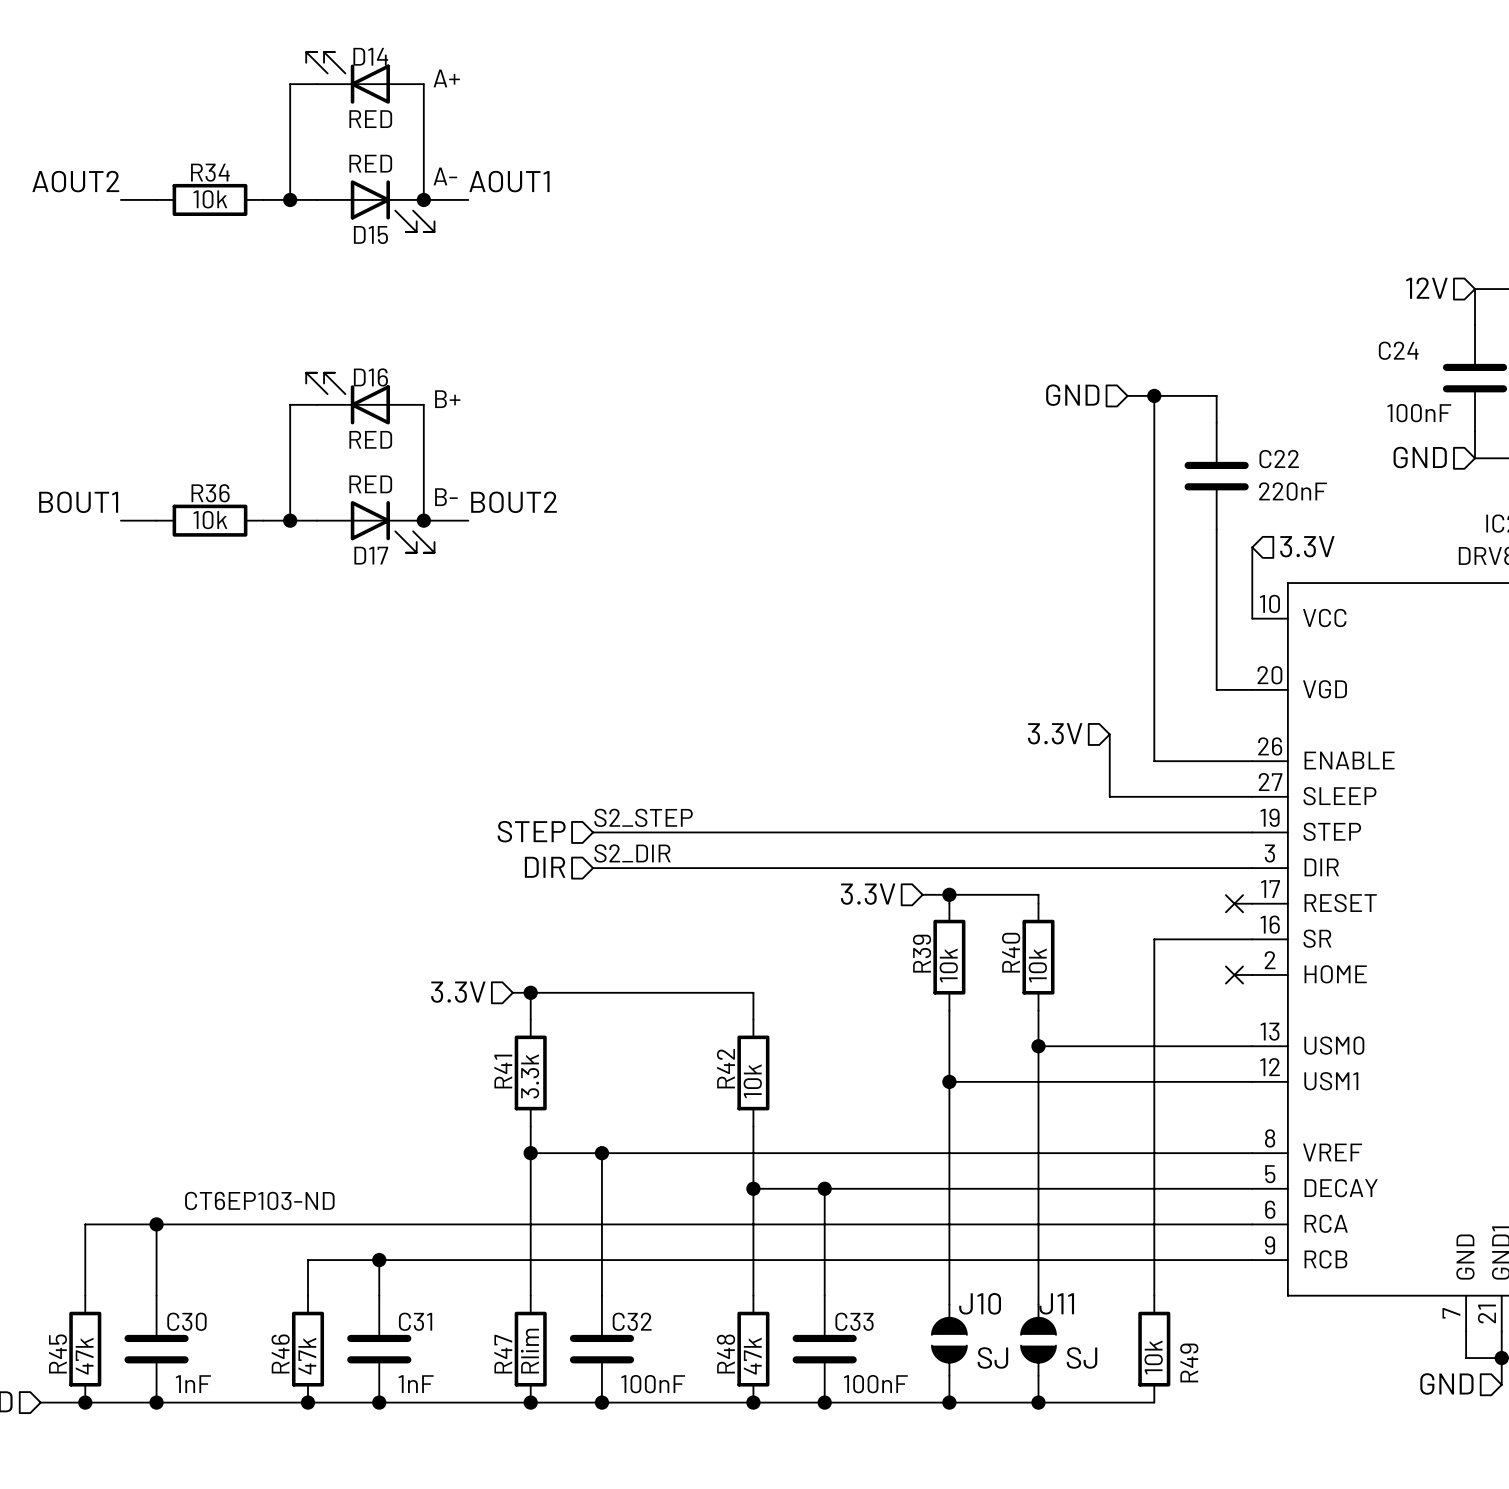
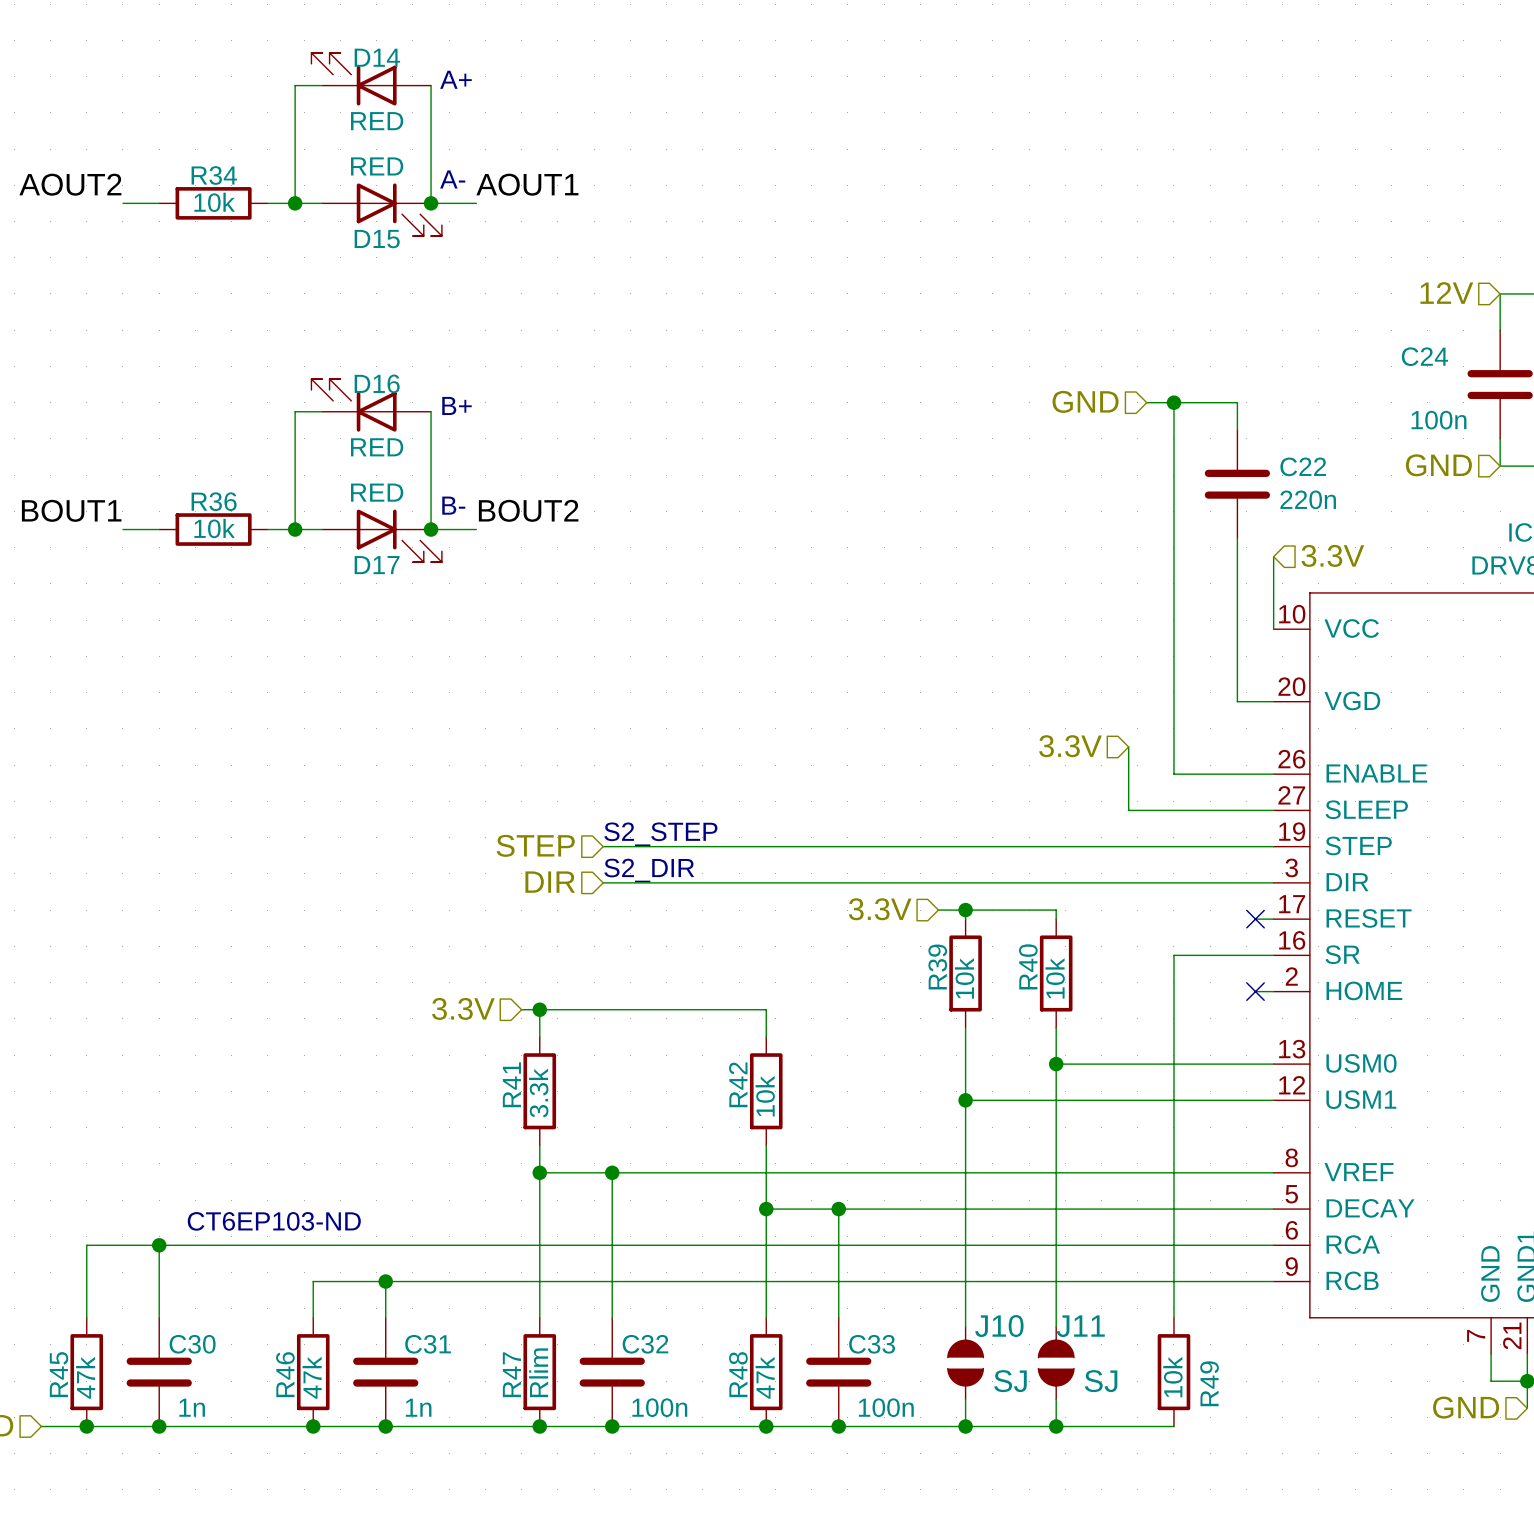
C24 value: 100nF (1419, 413) -> 100n (1438, 420)
C22 value: 220nF (1293, 491) -> 220n (1308, 499)
C30 value: 1nF (193, 1384) -> 1n (192, 1407)
C31 value: 1nF (416, 1384) -> 1n (418, 1407)
C32 value: 100nF (653, 1384) -> 100n (659, 1407)
C33 value: 100nF (875, 1384) -> 100n (886, 1407)

